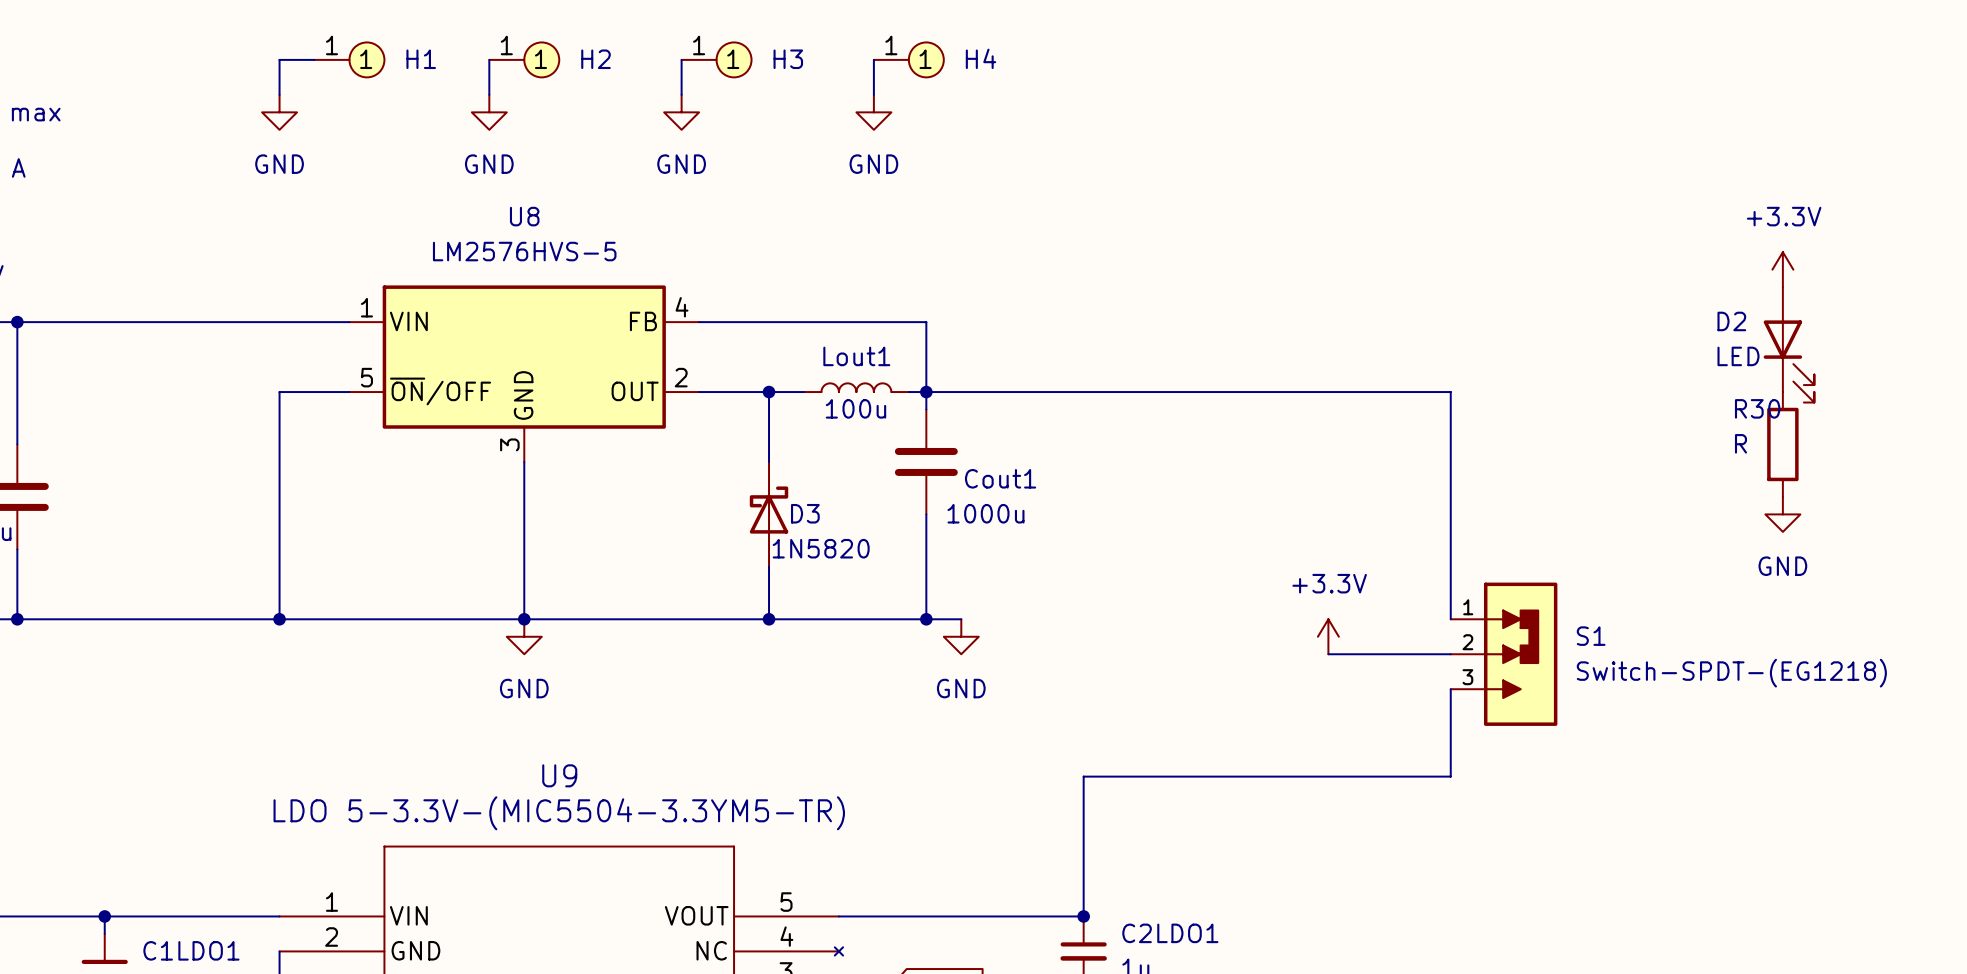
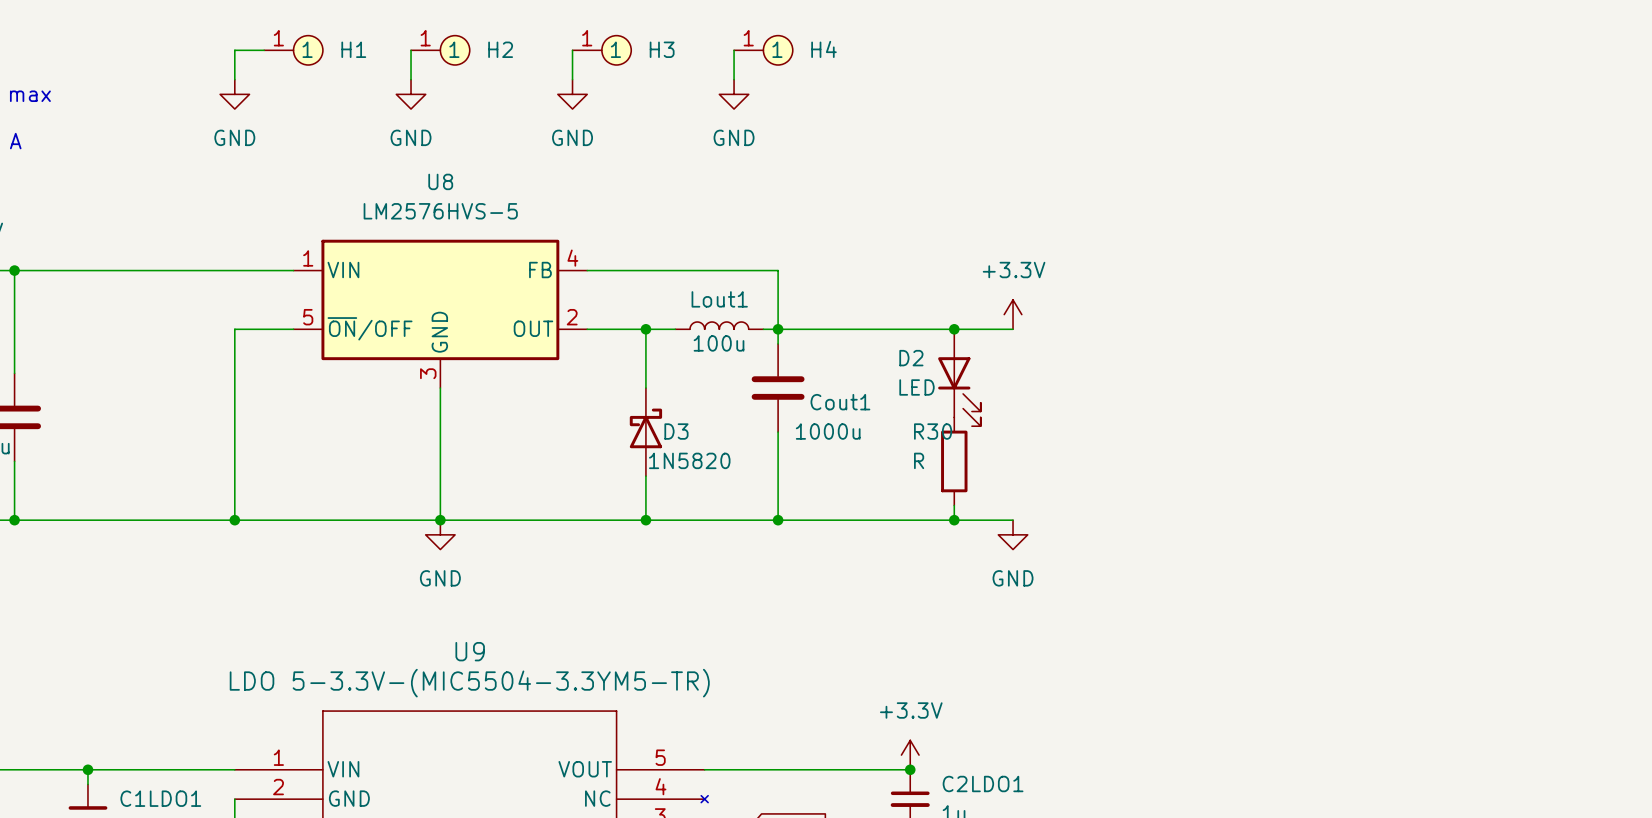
power symbol: +3.3V (1782, 269) -> none
D2 position: (1789, 344) -> (959, 377)
power symbol: none -> +3.3V (1013, 314)
junction: none -> (954, 329)
wire: (1206, 392) (1450, 392) (1450, 619) -> none
R30 position: (1782, 444) -> (954, 461)
power symbol: GND (1782, 514) -> none
wire: none -> (954, 505) (954, 520)
wire: none -> (807, 520) (1013, 520)
junction: none -> (954, 520)
power symbol position: GND (961, 636) -> GND (1013, 534)
power symbol: +3.3V (1328, 636) -> none
wire: (1328, 654) (1450, 654) -> none
S1: Switch-SPDT-(EG1218) (1504, 654) -> none
wire: (1450, 689) (1450, 776) (1083, 776) (1083, 916) -> none
power symbol: none -> +3.3V (910, 755)

